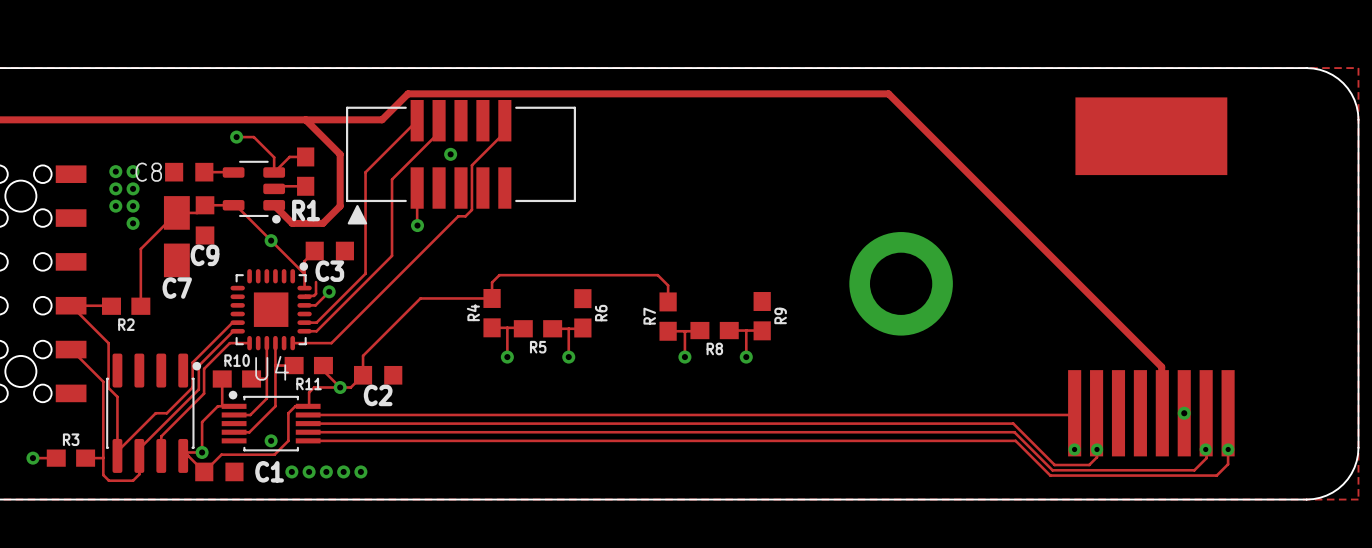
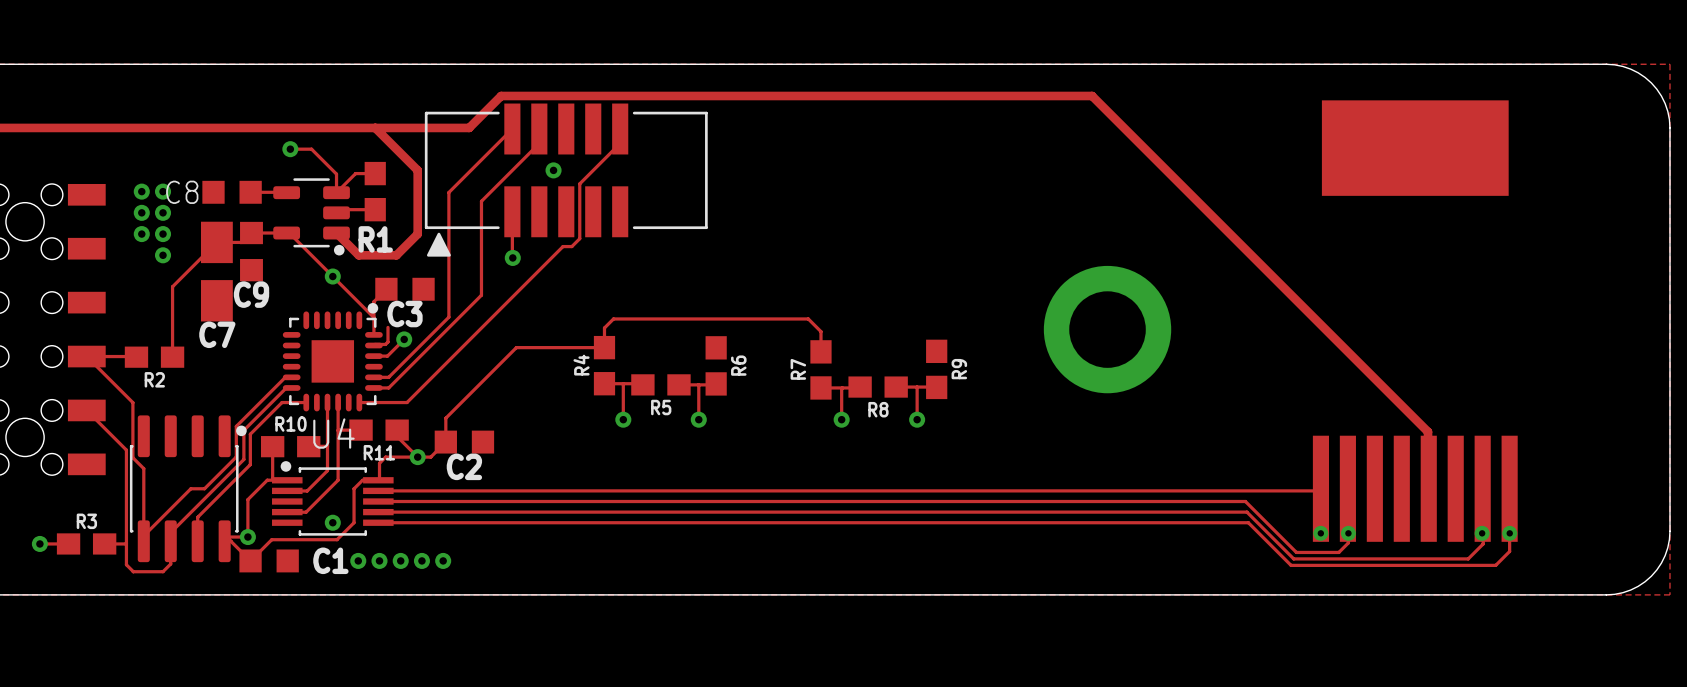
via: (1184, 413) -> none

